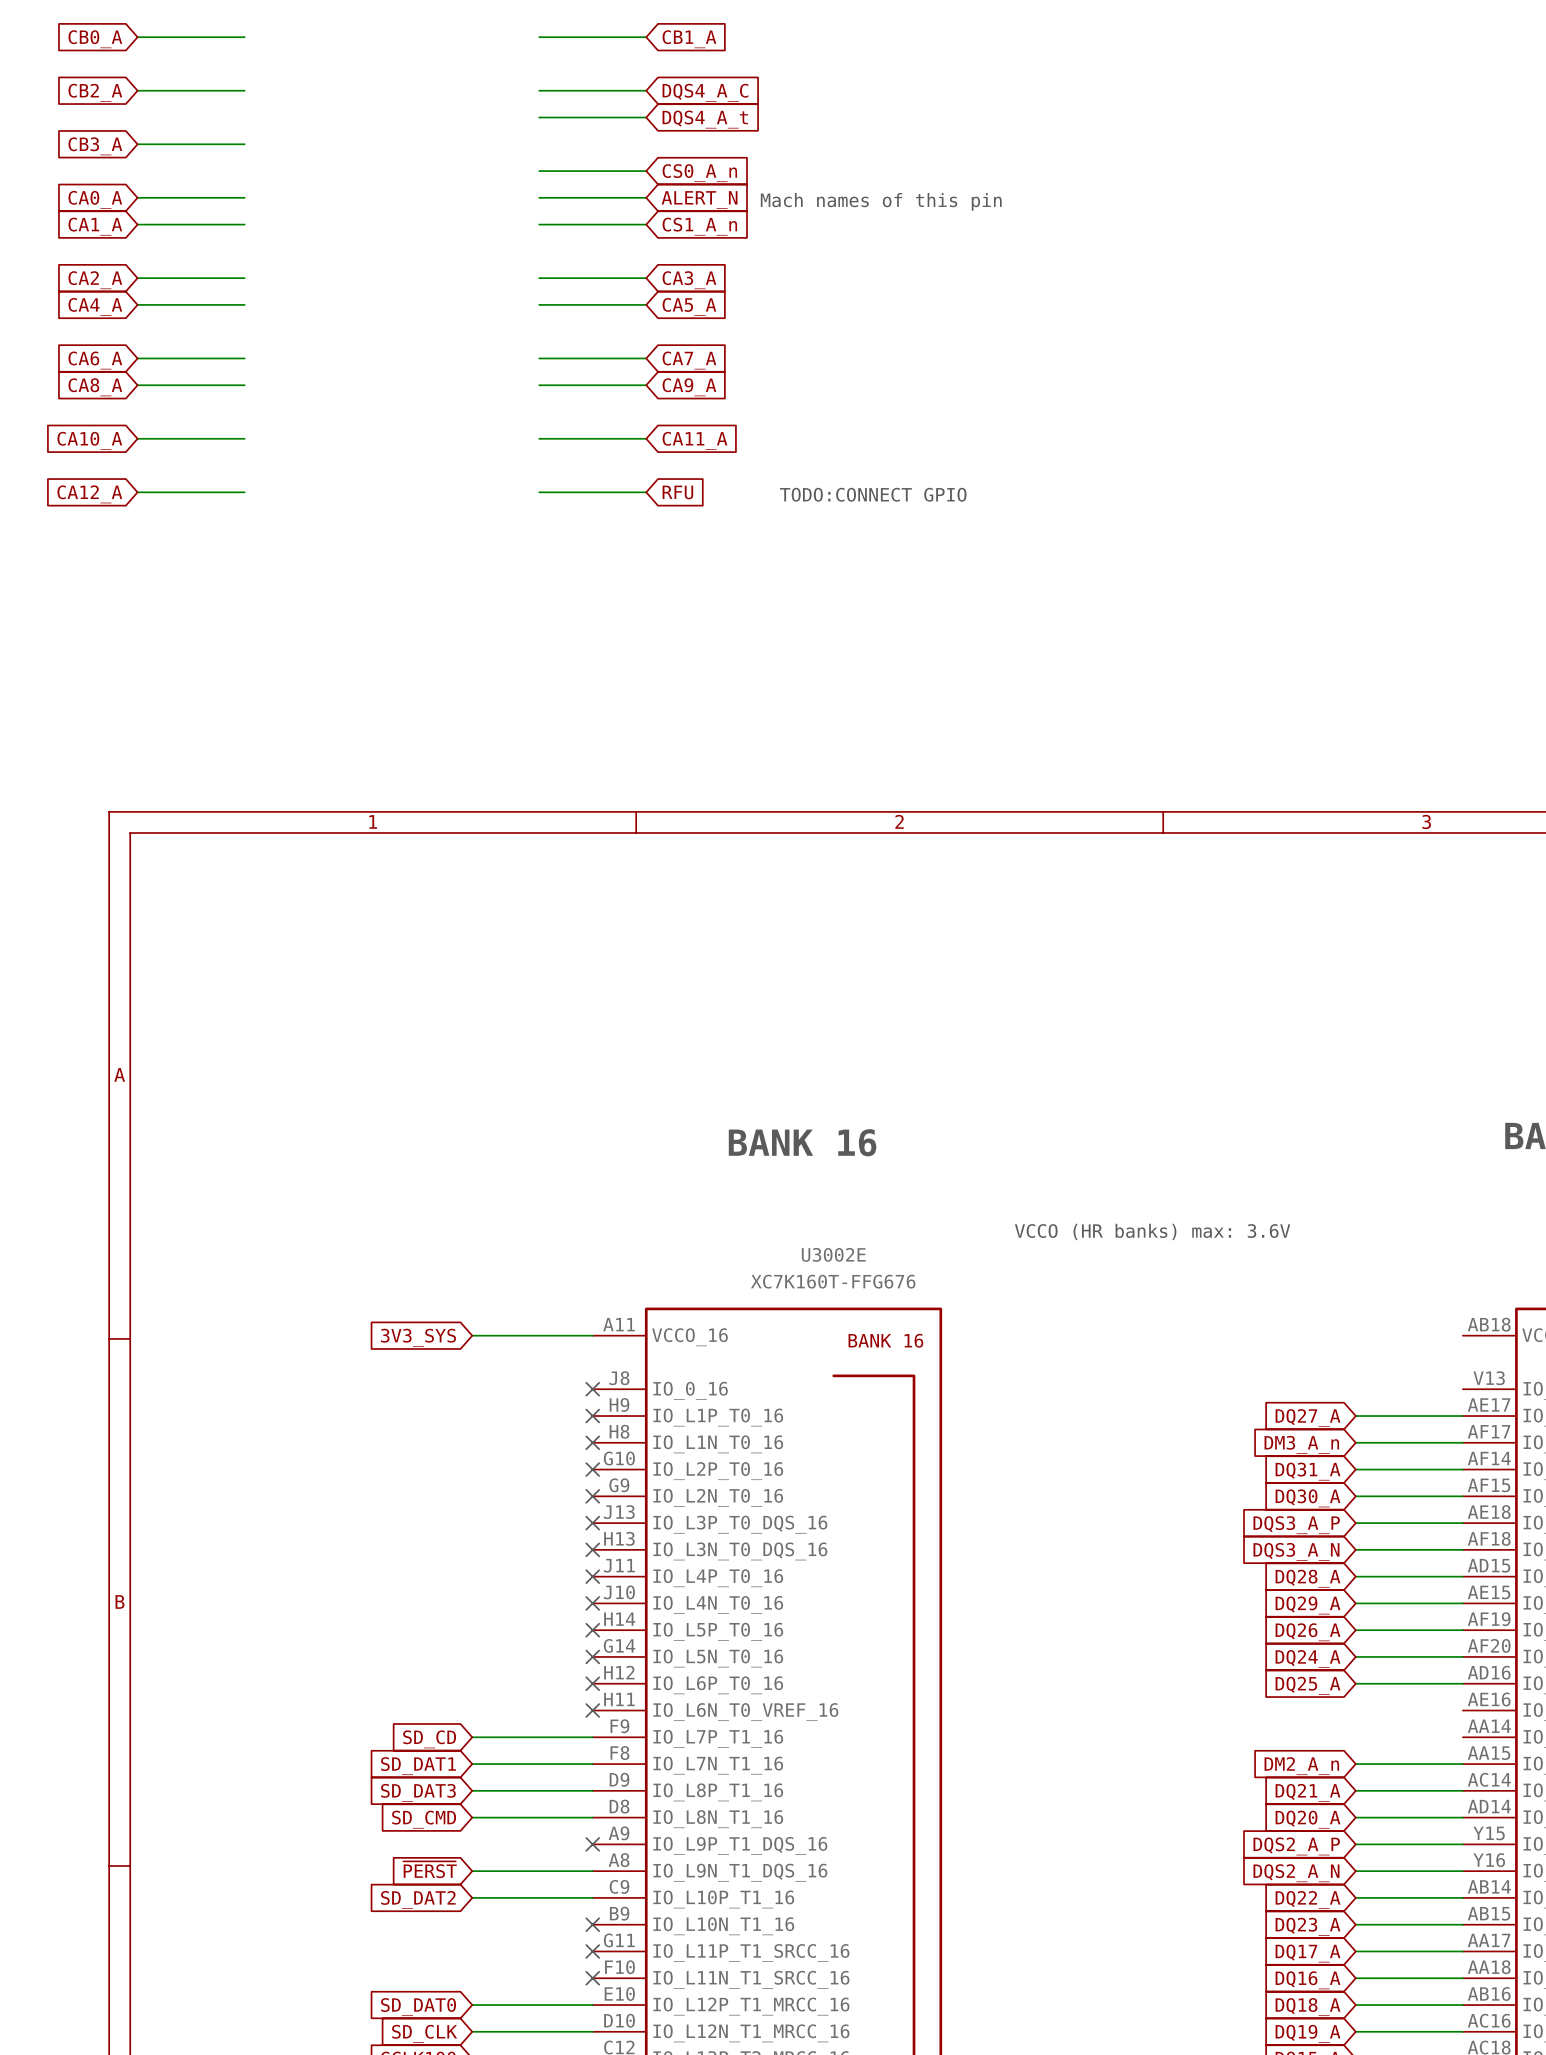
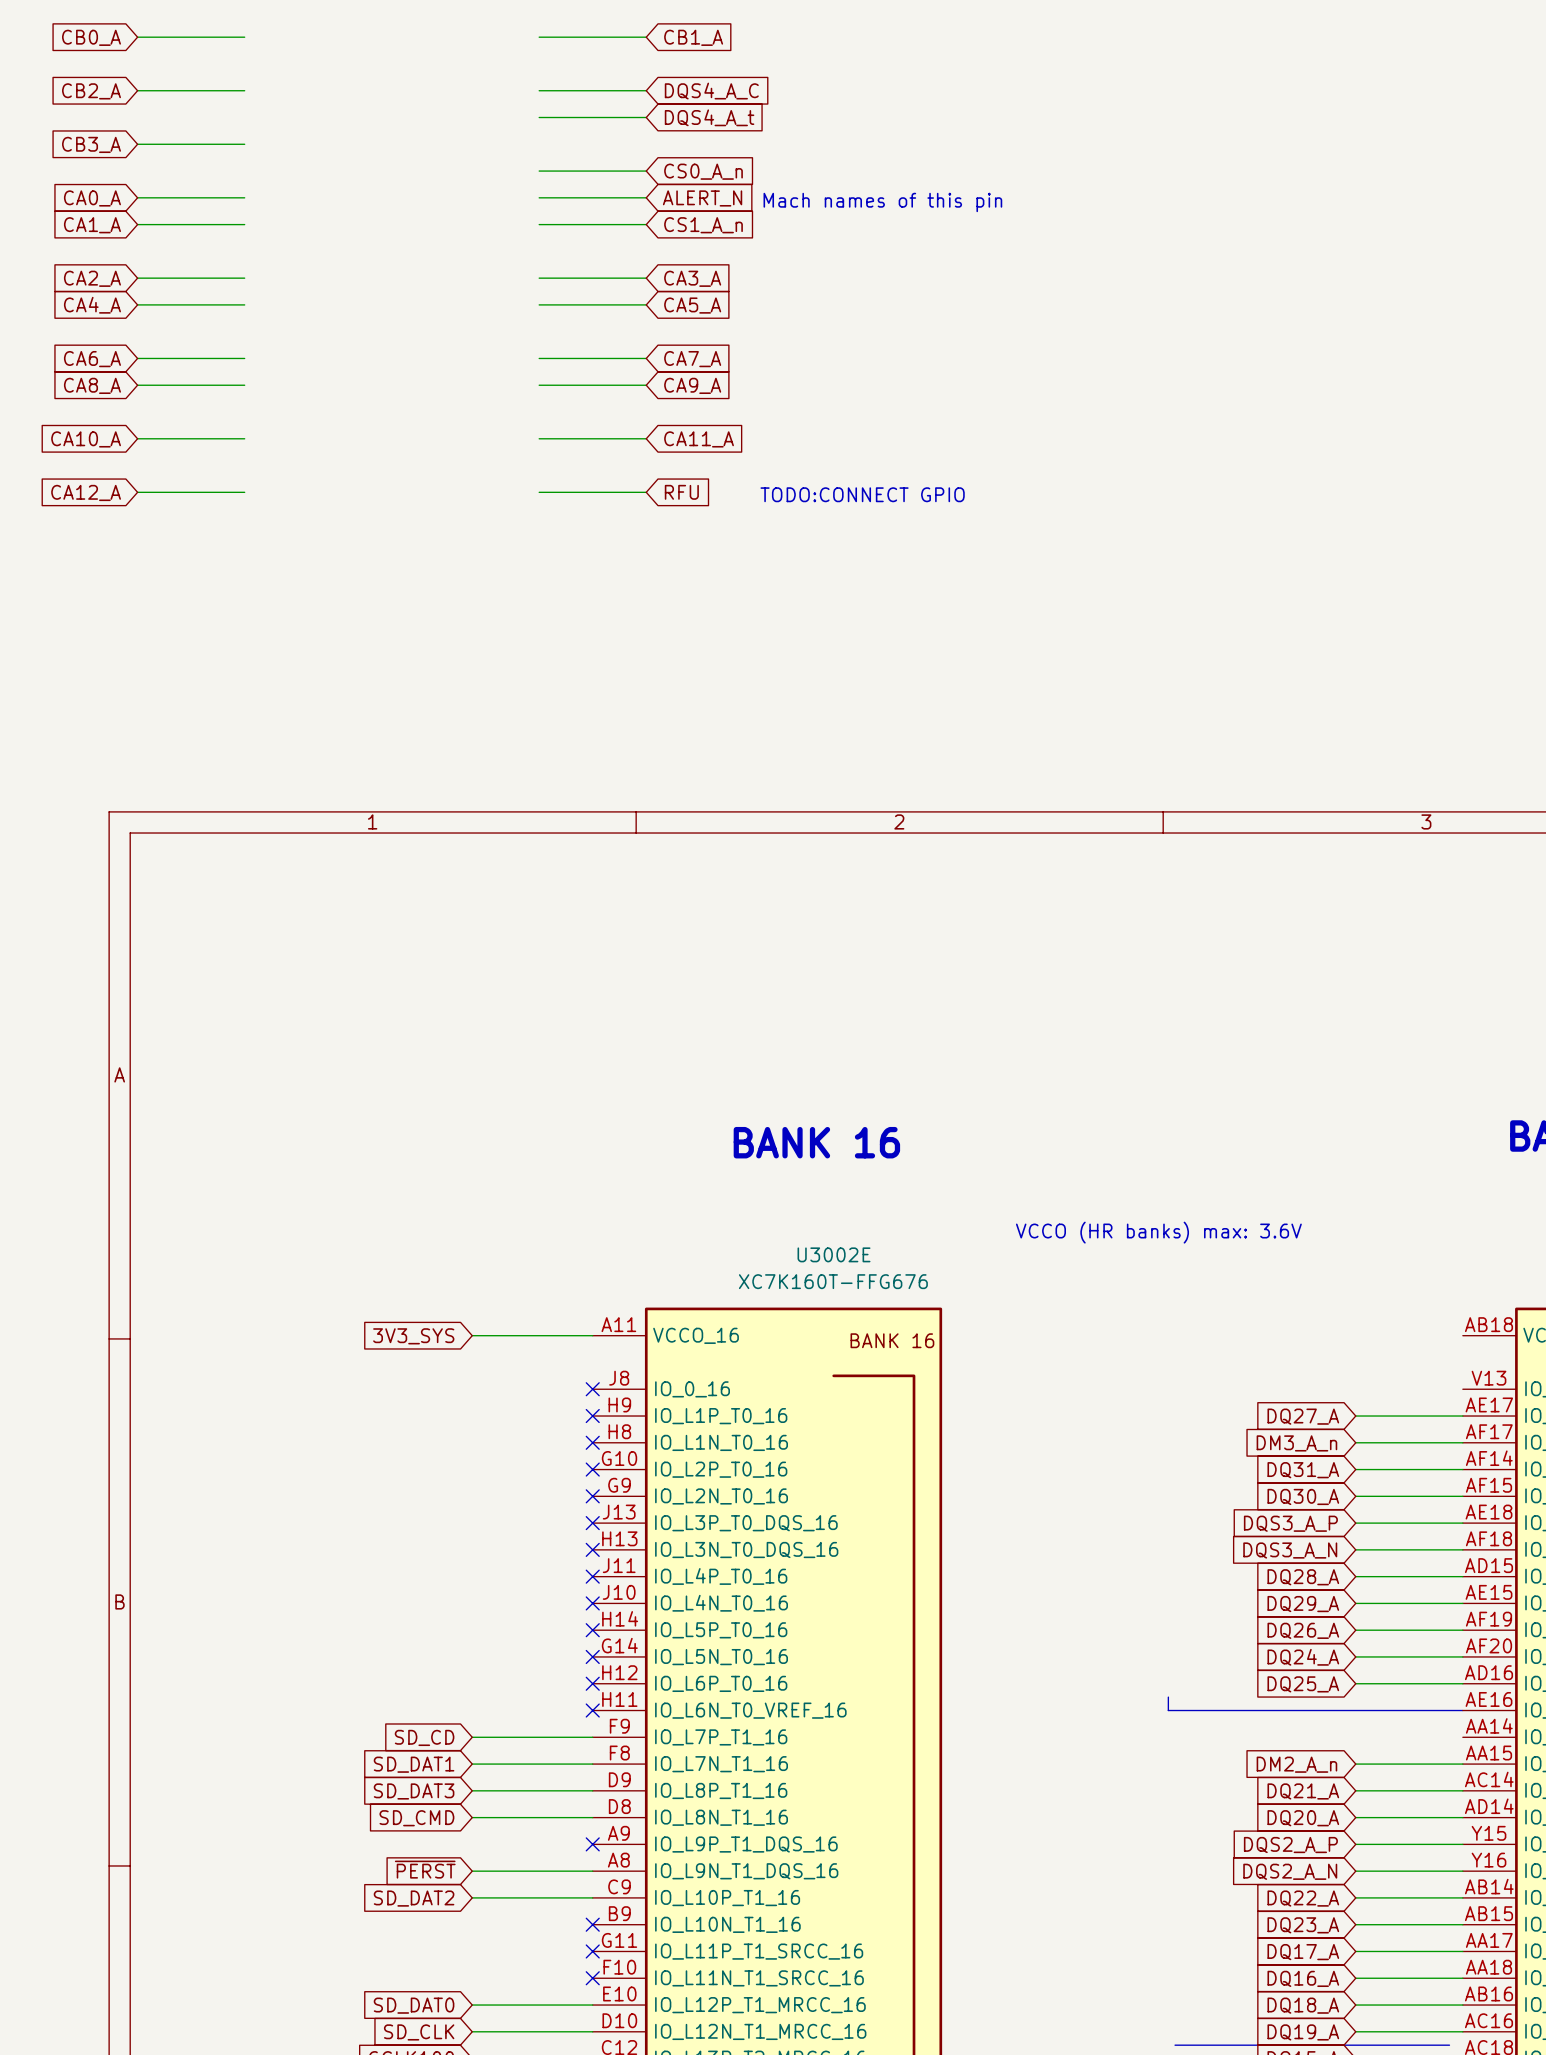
line: none -> (1168, 1697) (1168, 1710) (1462, 1710)
line: none -> (1175, 2045) (1449, 2045)

